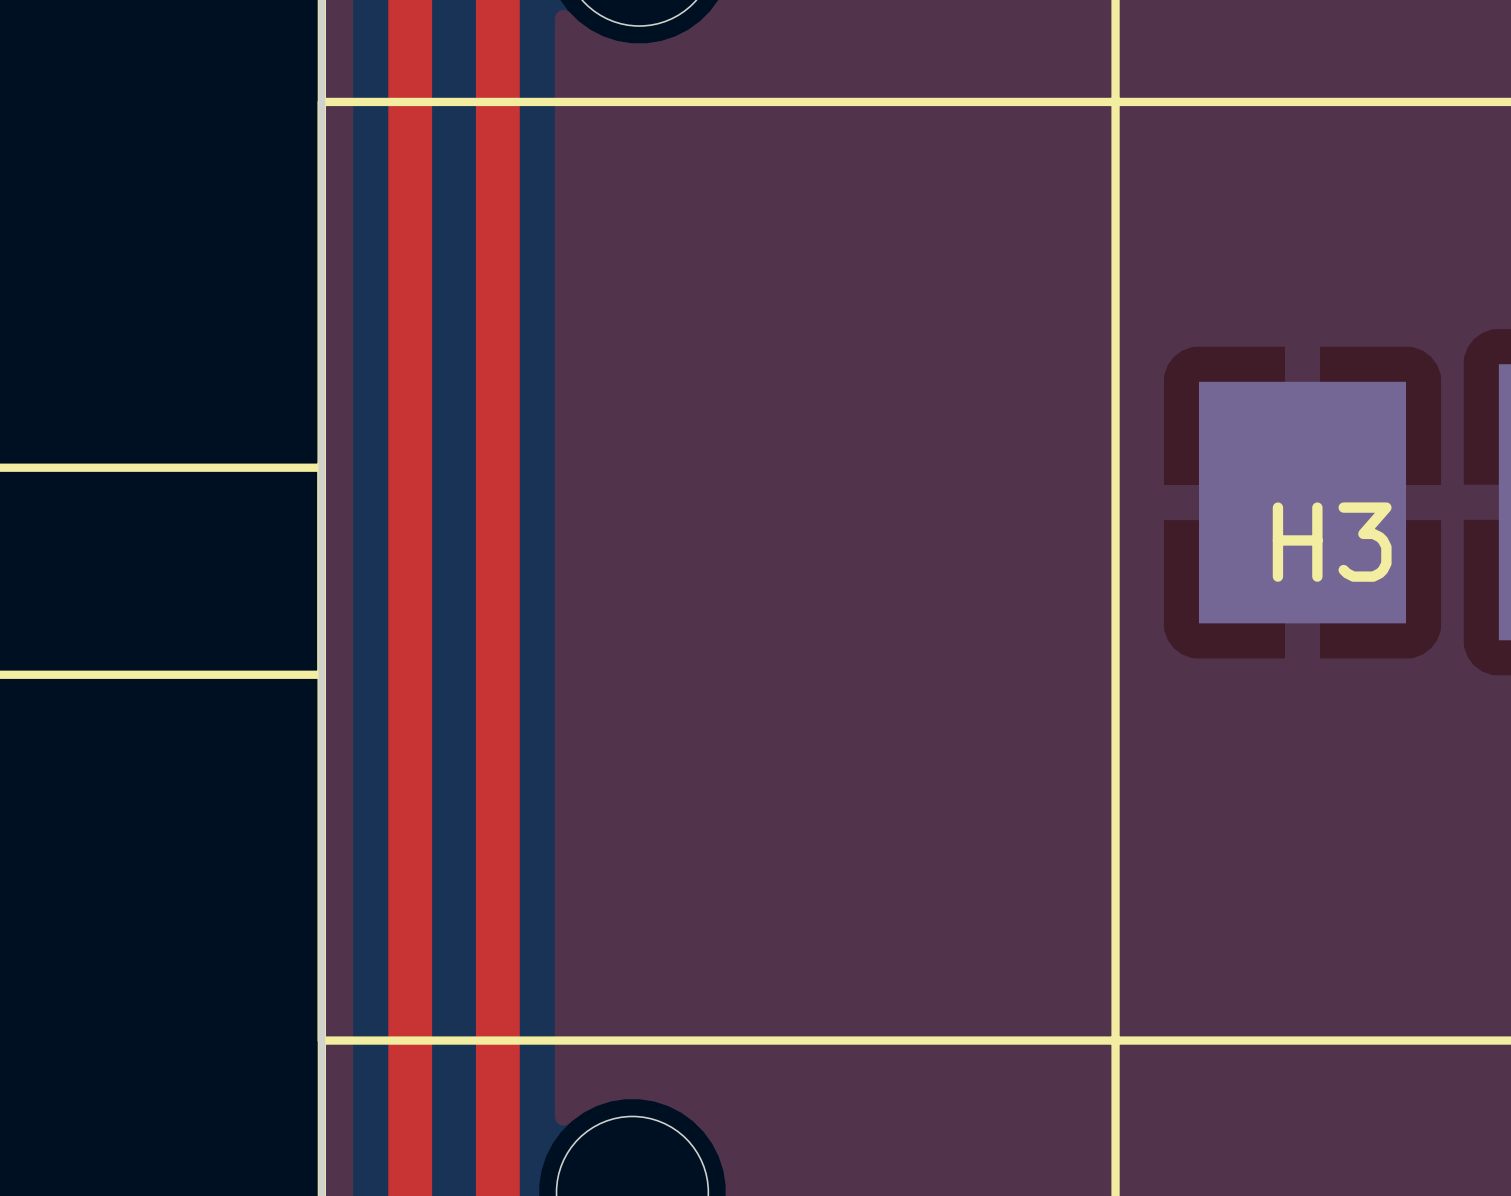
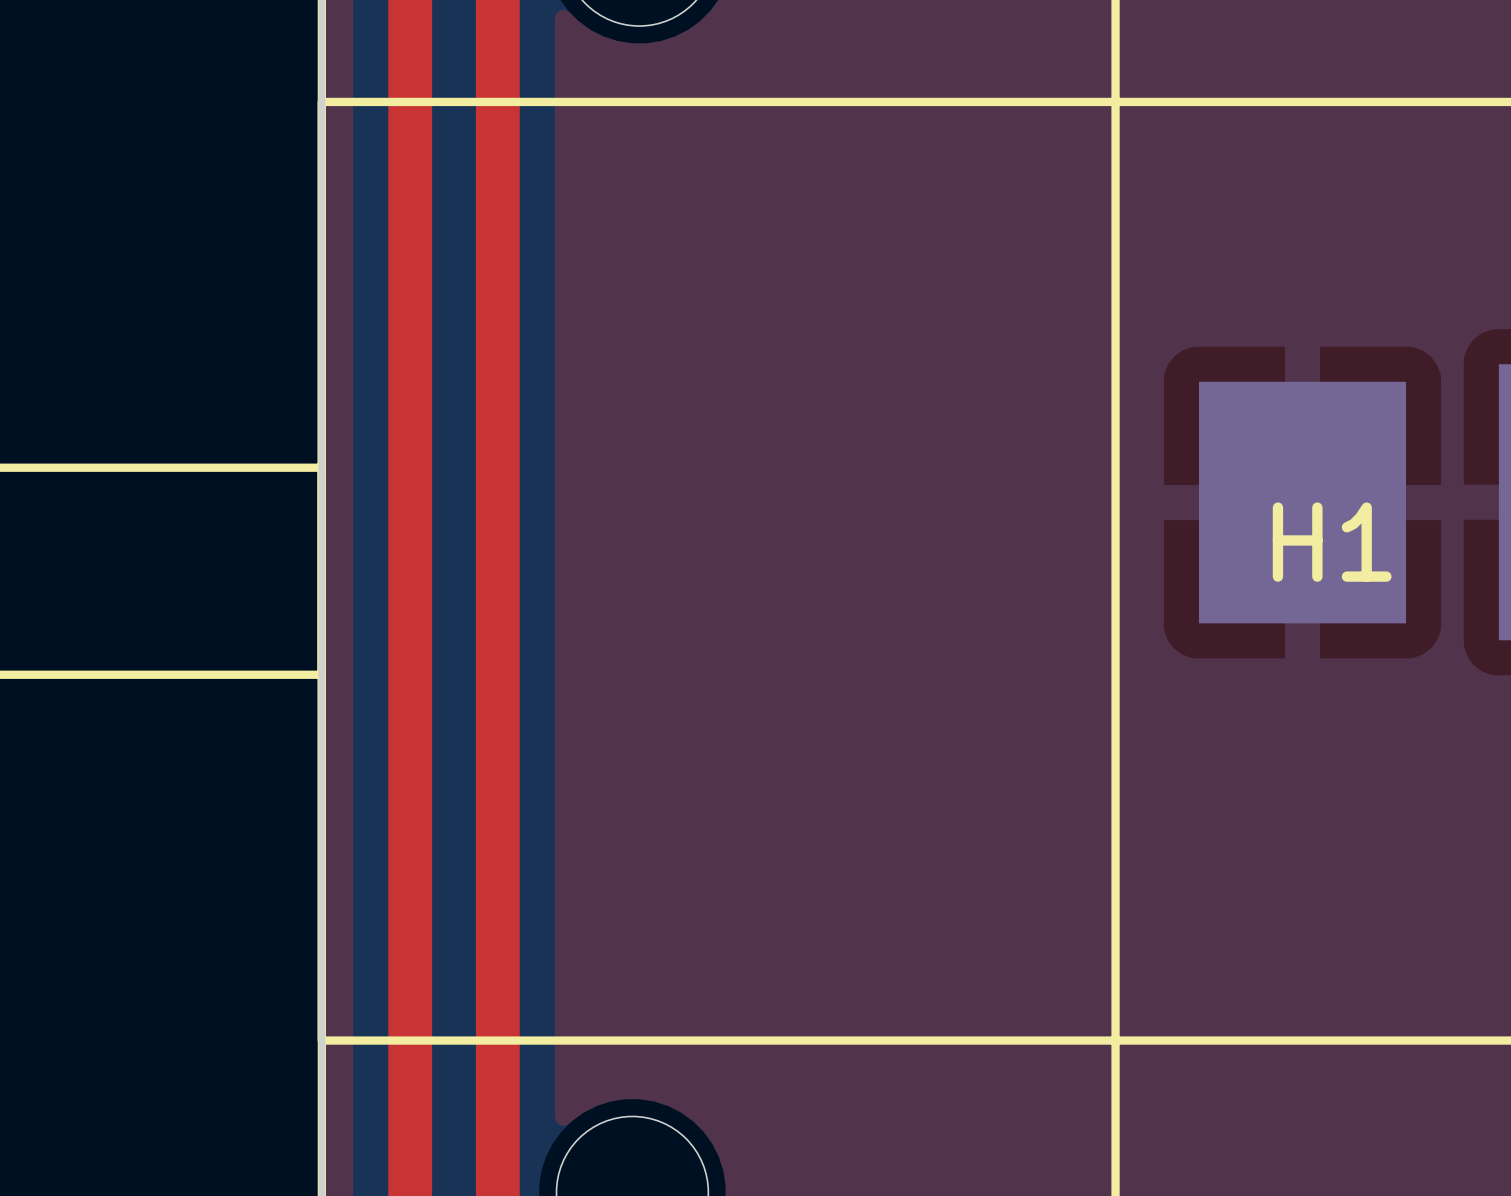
H3 name: H3 (1332, 542) -> H1 (1332, 542)

